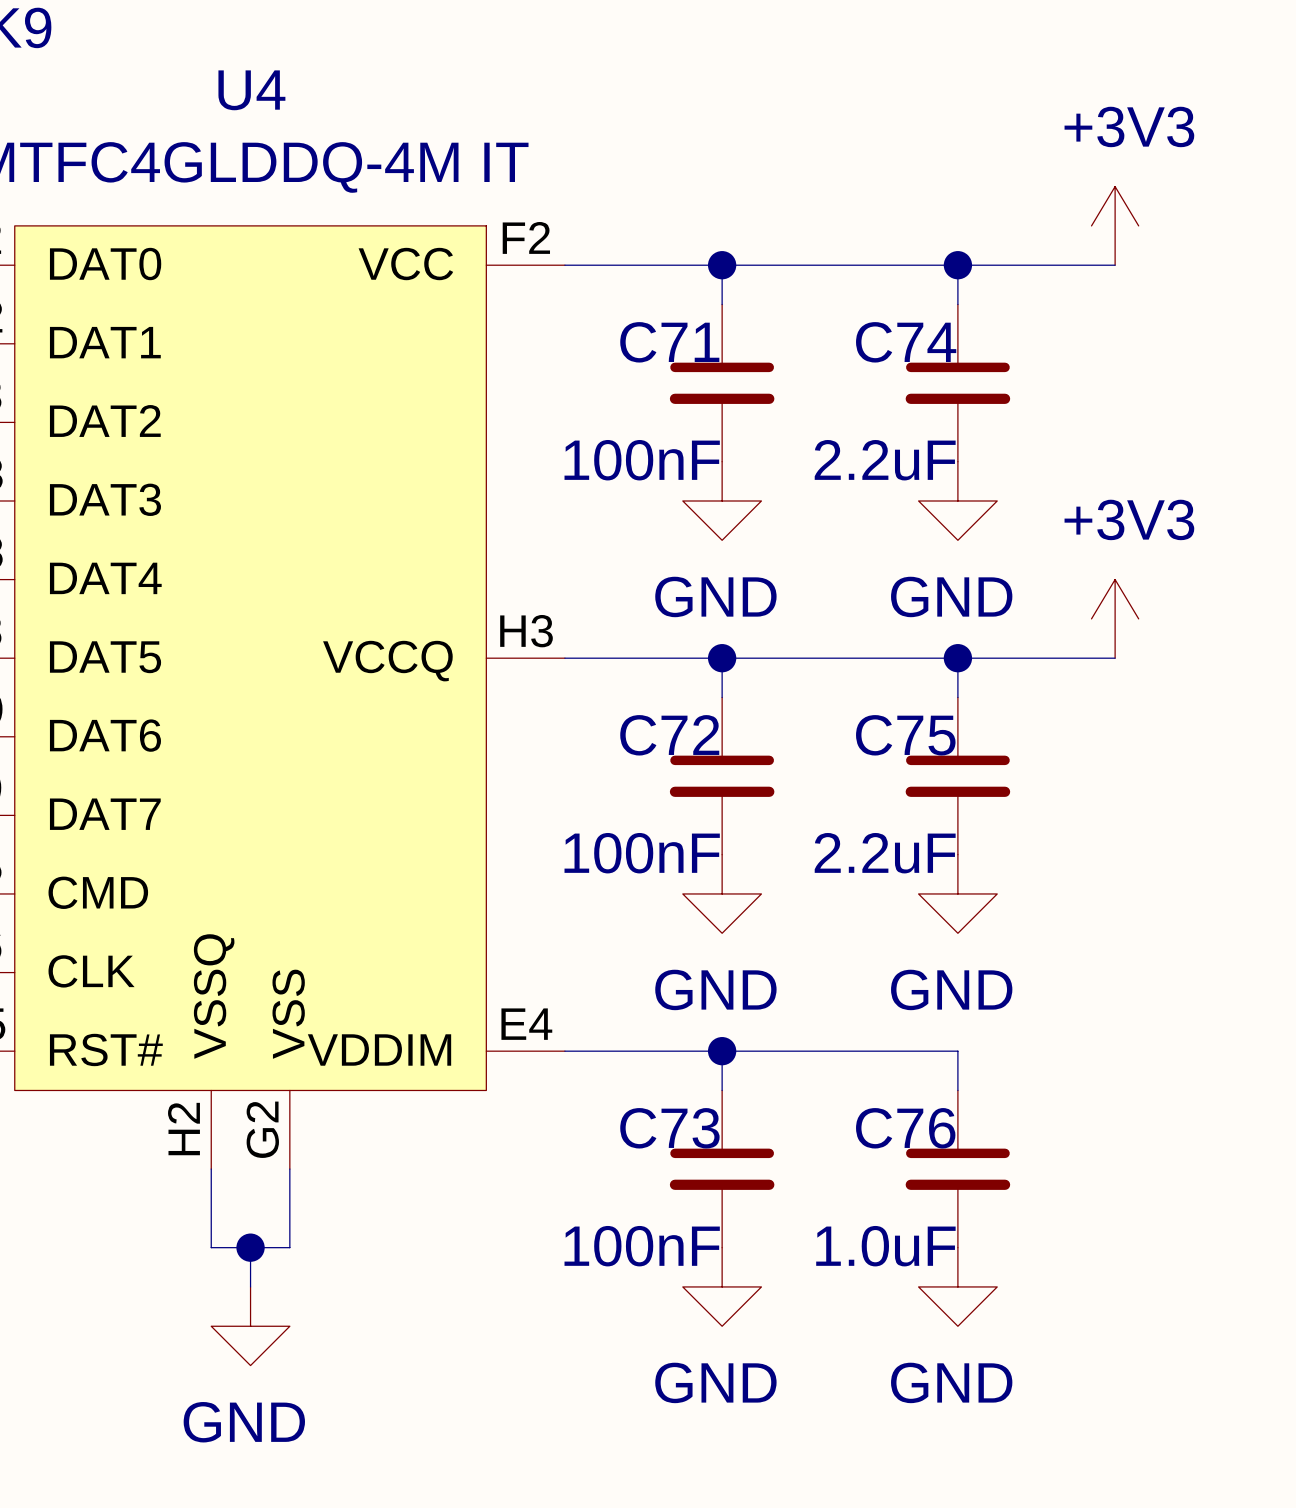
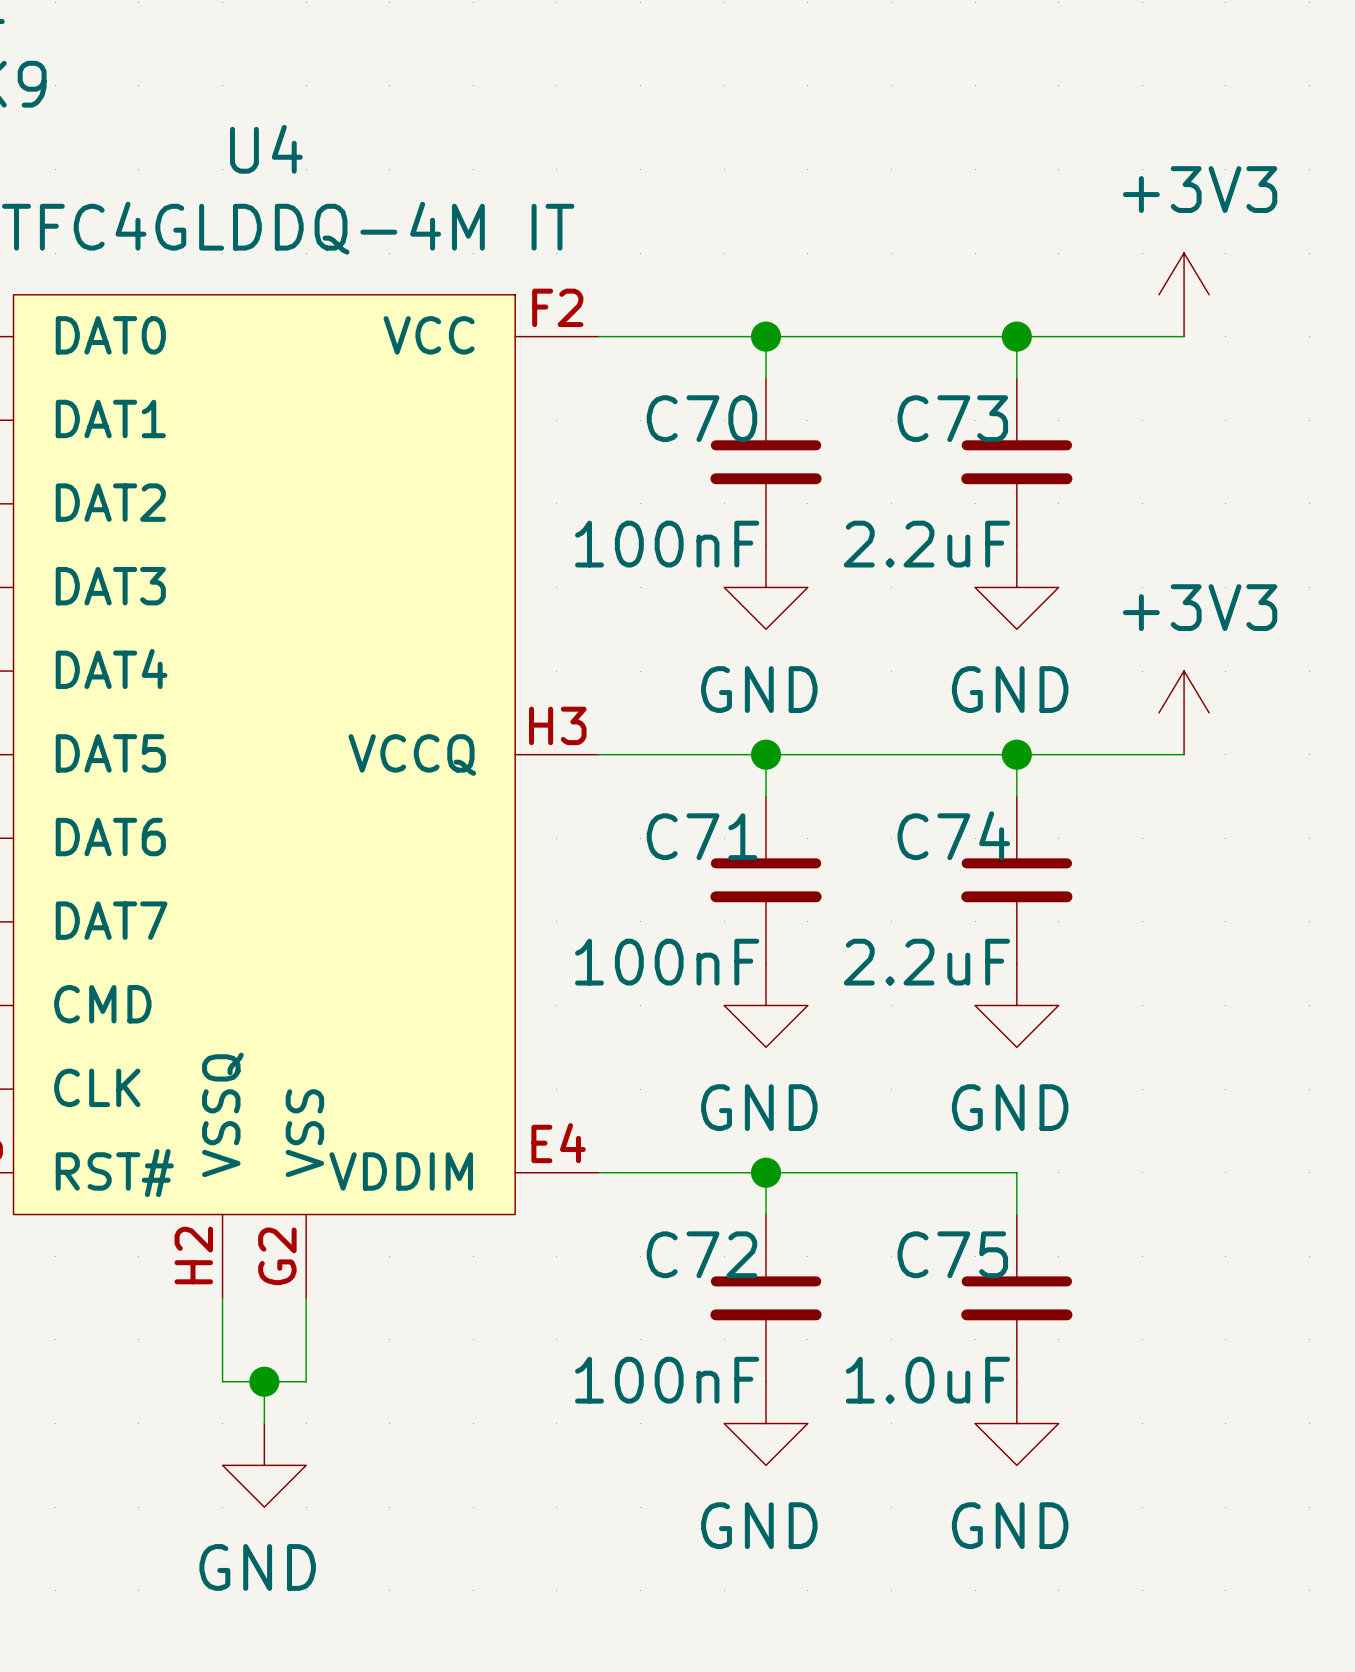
C71 name: C71 (669, 342) -> C70 (701, 418)
C74 name: C74 (906, 342) -> C73 (952, 418)
C72 name: C72 (669, 735) -> C71 (701, 836)
C75 name: C75 (905, 735) -> C74 (953, 835)
C73 name: C73 (669, 1128) -> C72 (701, 1254)
C76 name: C76 (905, 1128) -> C75 (952, 1254)

